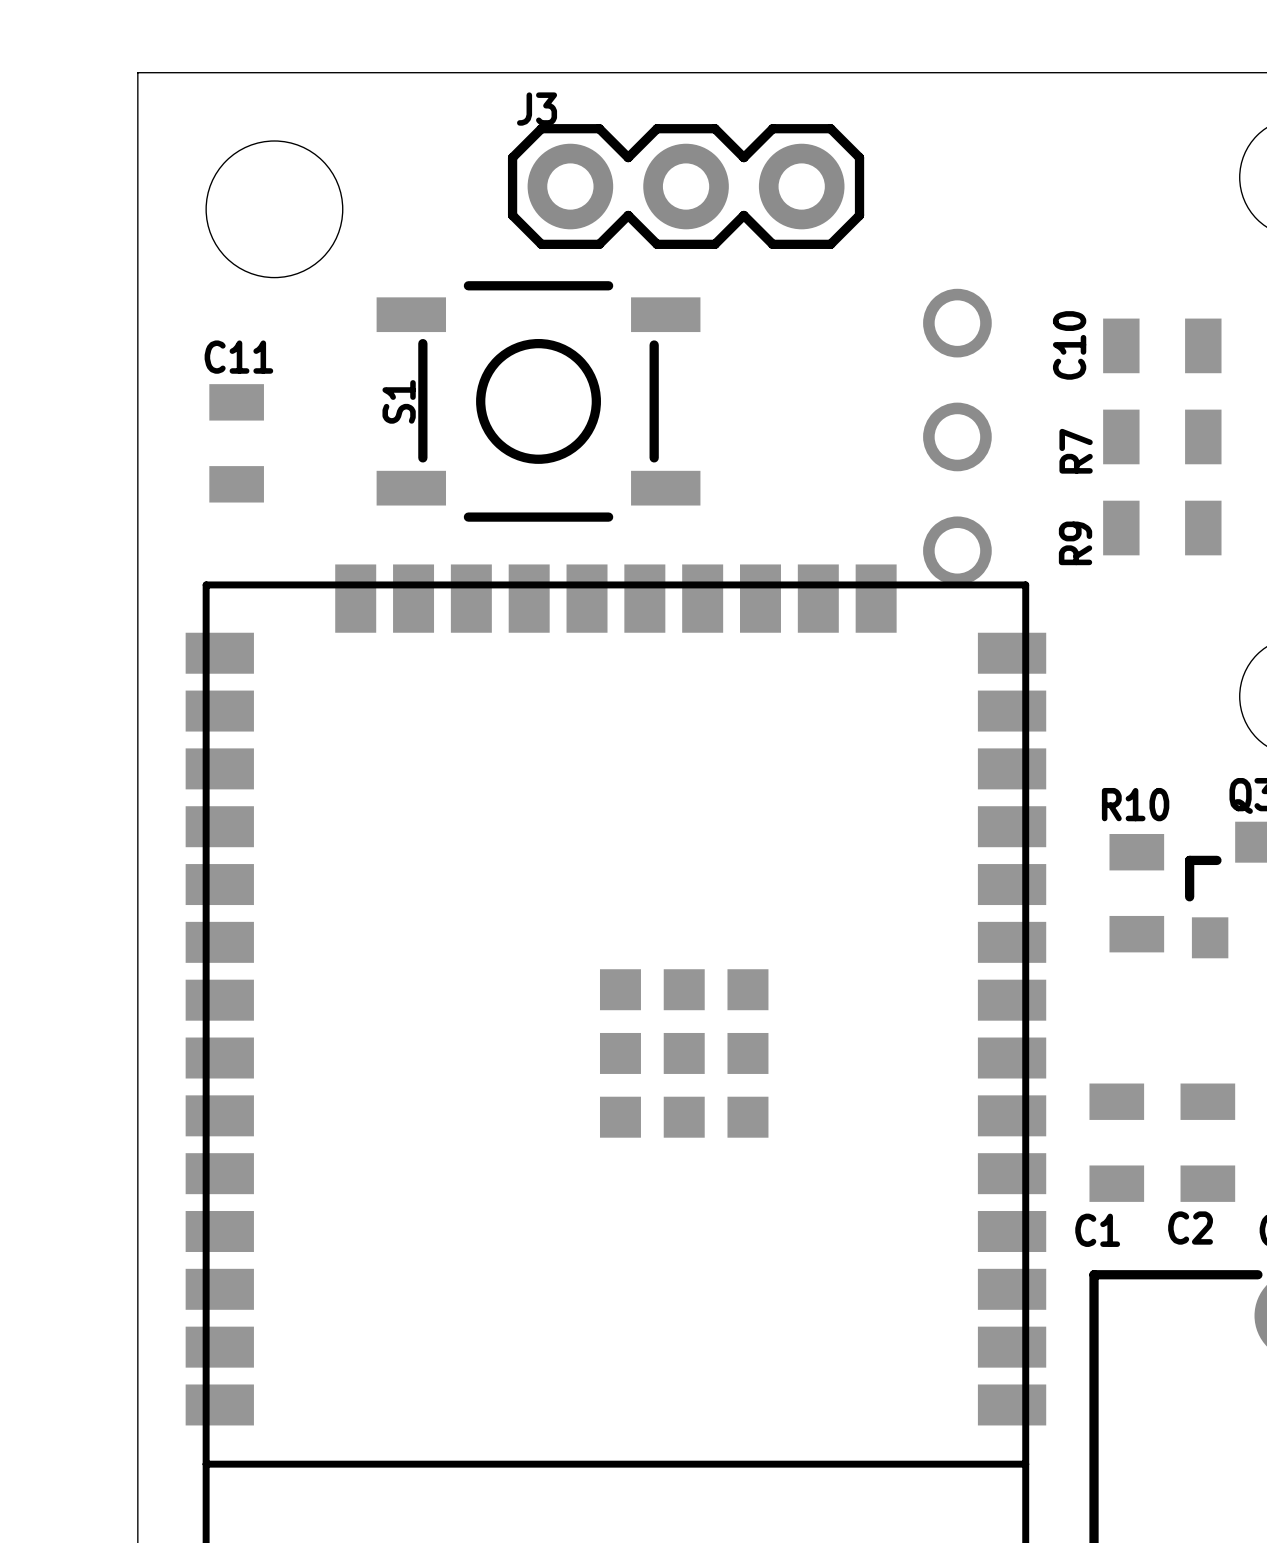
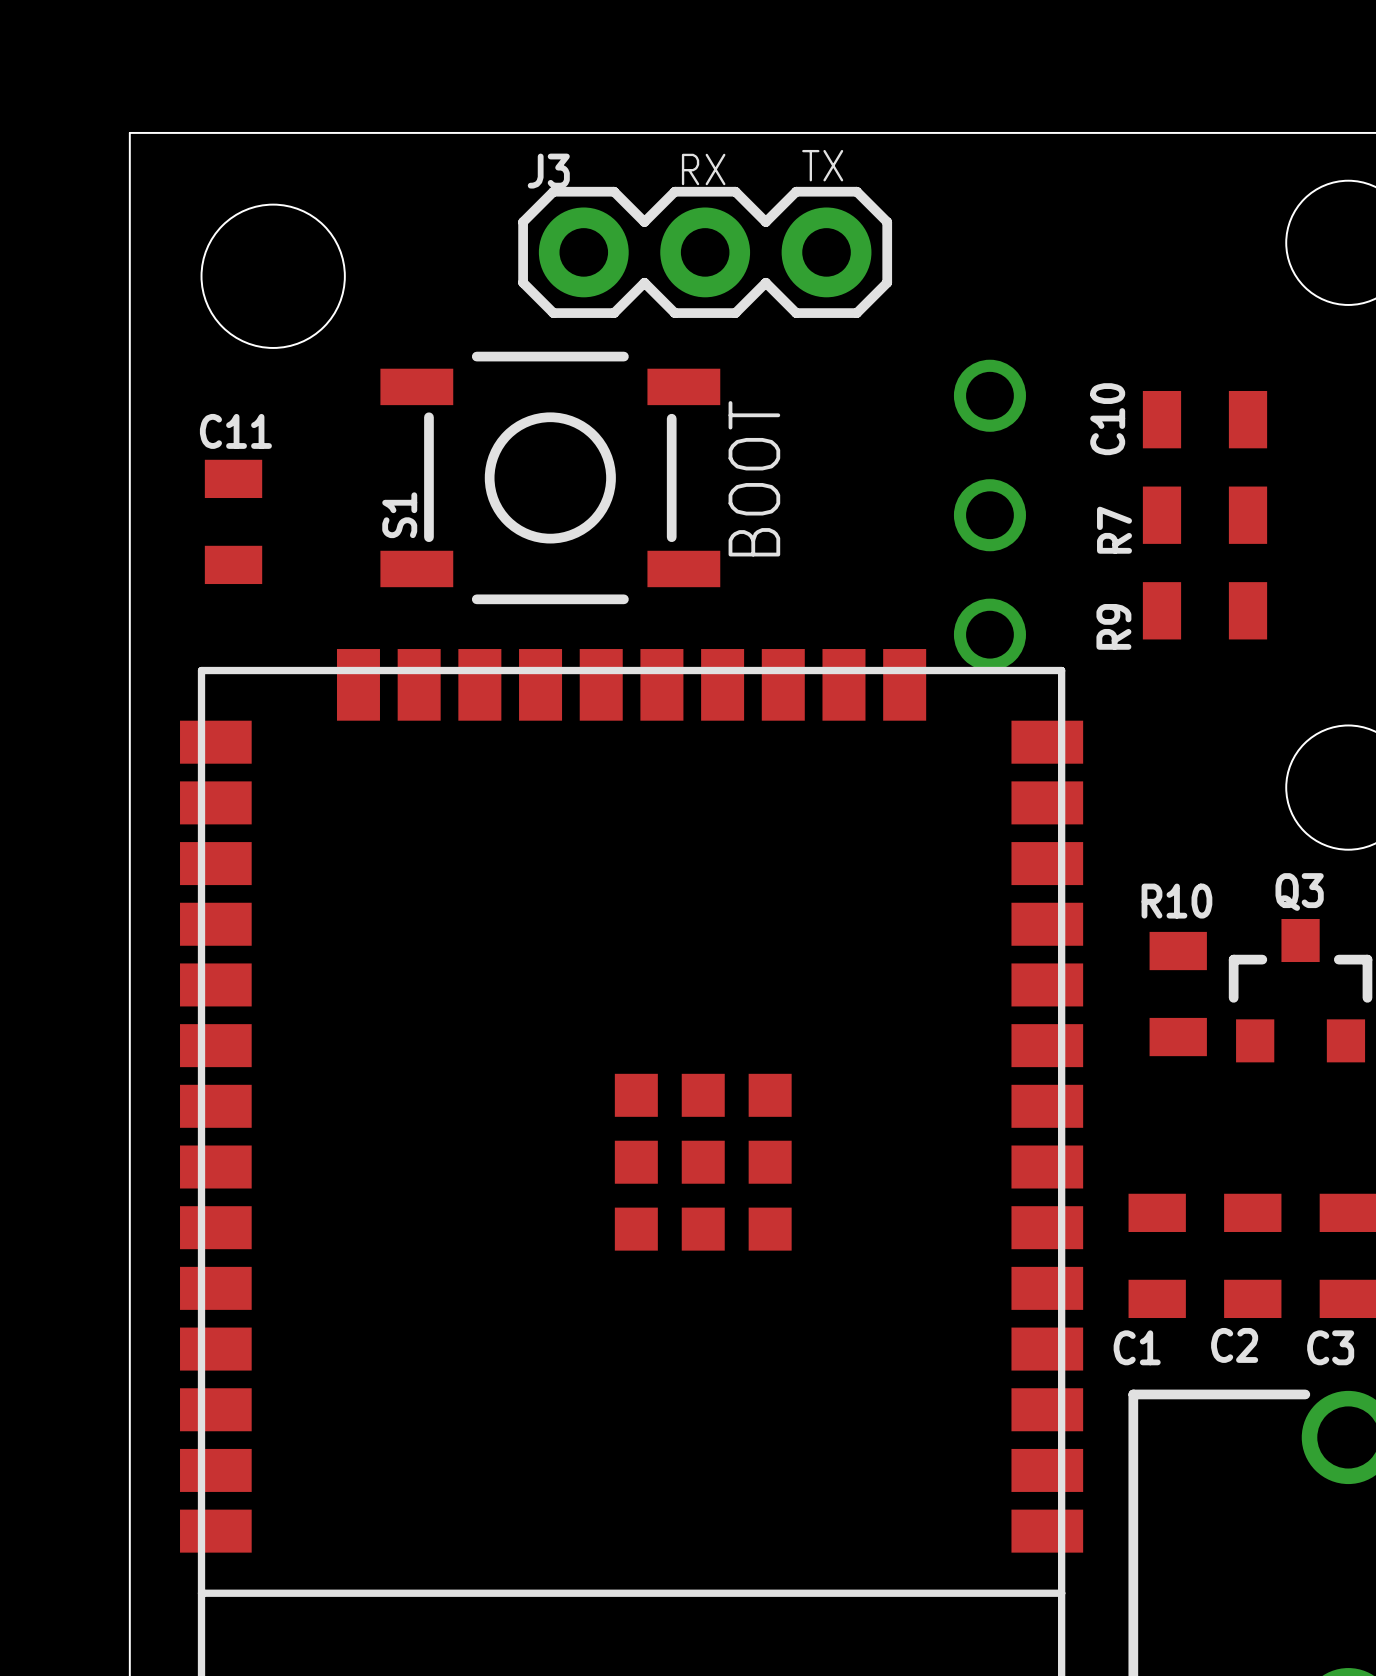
text: none -> TX (822, 165)
text: none -> RX (703, 169)
S1 name position: S1 (399, 401) -> S1 (399, 515)
text: none -> BOOT (754, 478)

